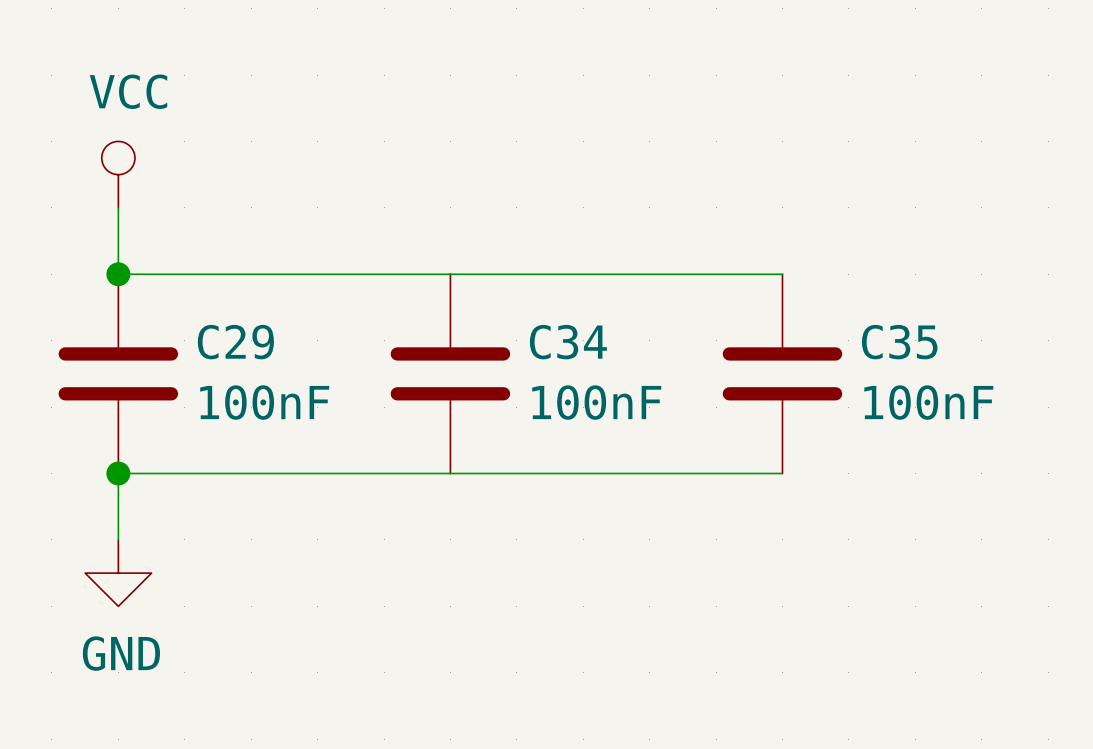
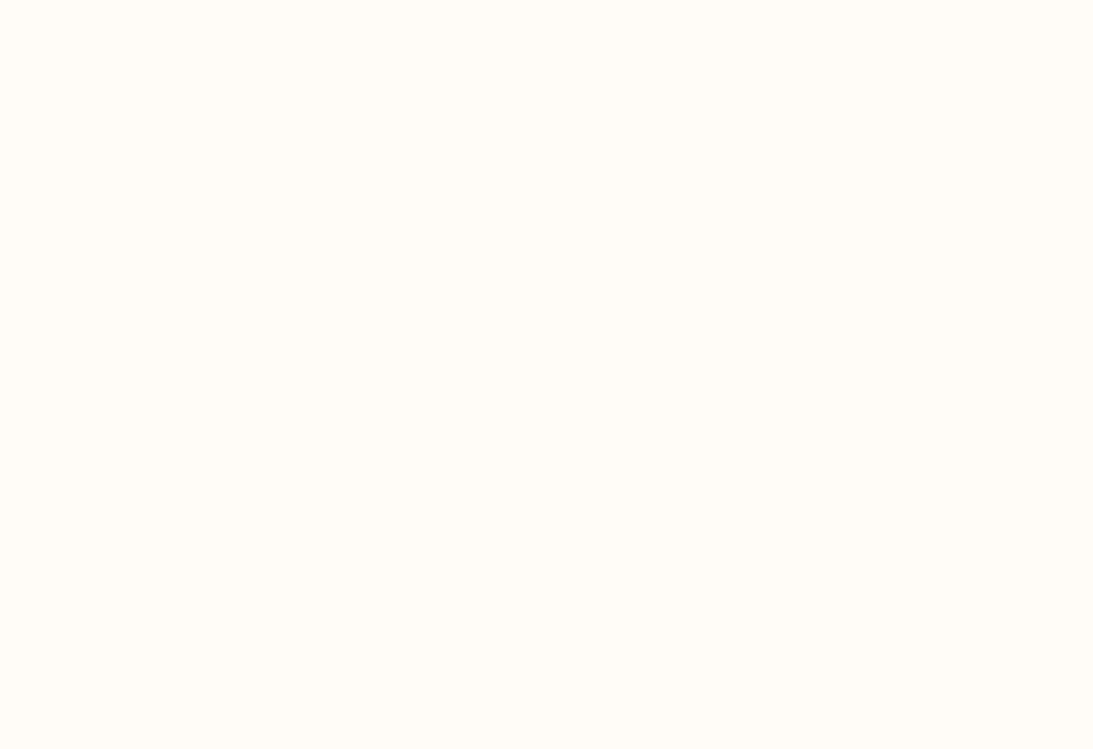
power symbol: VCC (118, 174) -> none
wire: (118, 207) (118, 274) (782, 274) -> none
junction: (118, 274) -> none
C29: 100nF (118, 373) -> none
C34: 100nF (450, 373) -> none
C35: 100nF (782, 373) -> none
junction: (118, 473) -> none
wire: (782, 473) (118, 473) (118, 539) -> none
power symbol: GND (118, 573) -> none

